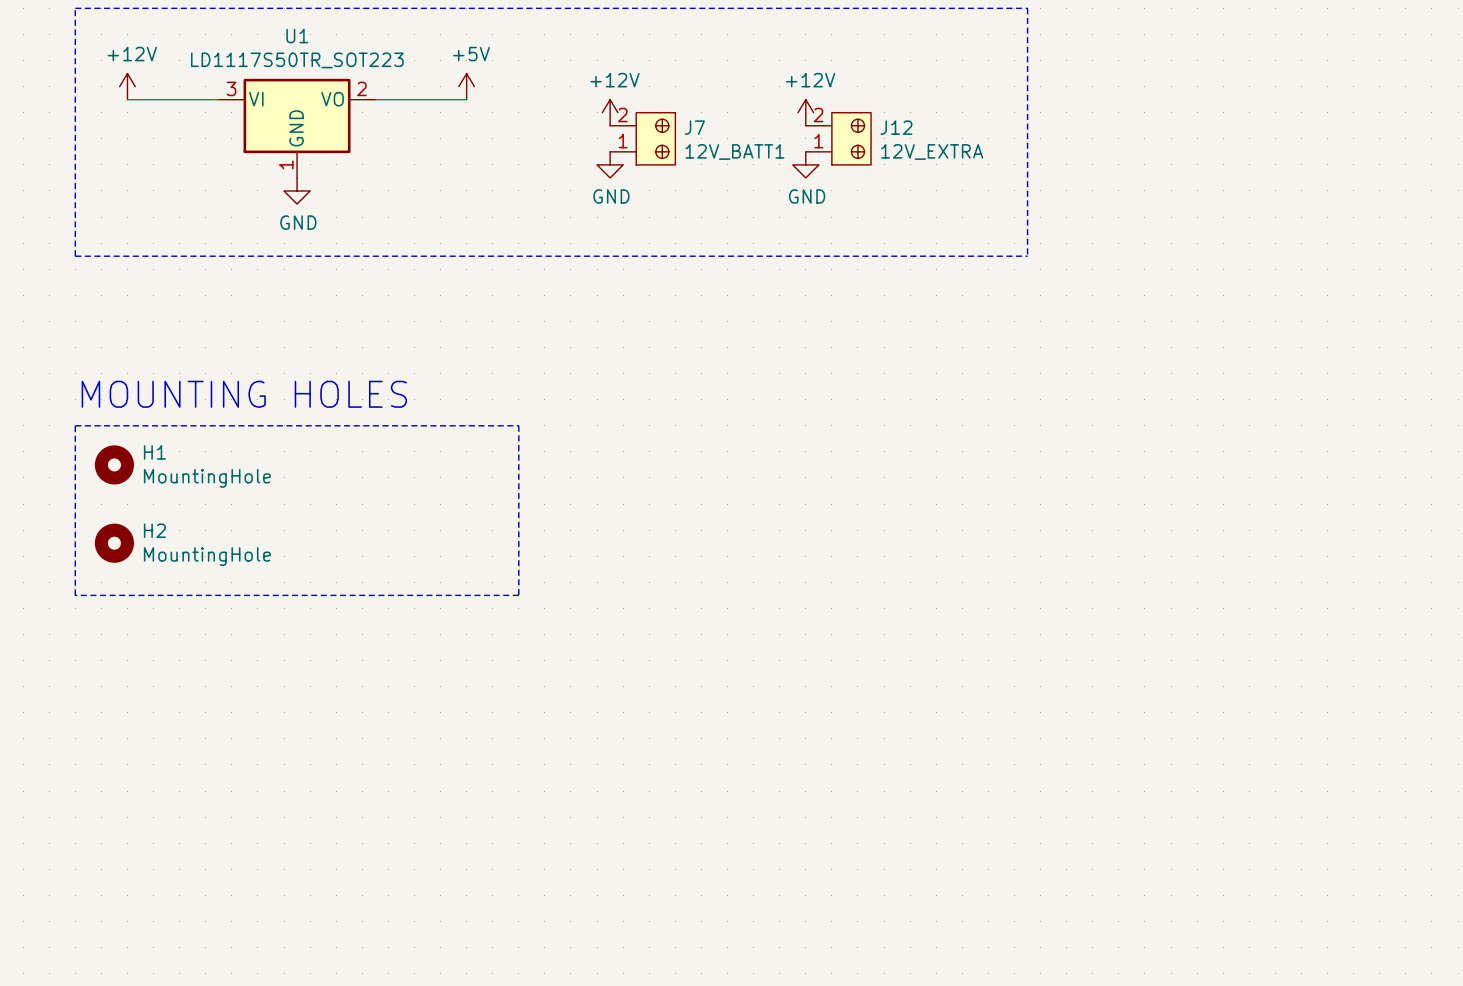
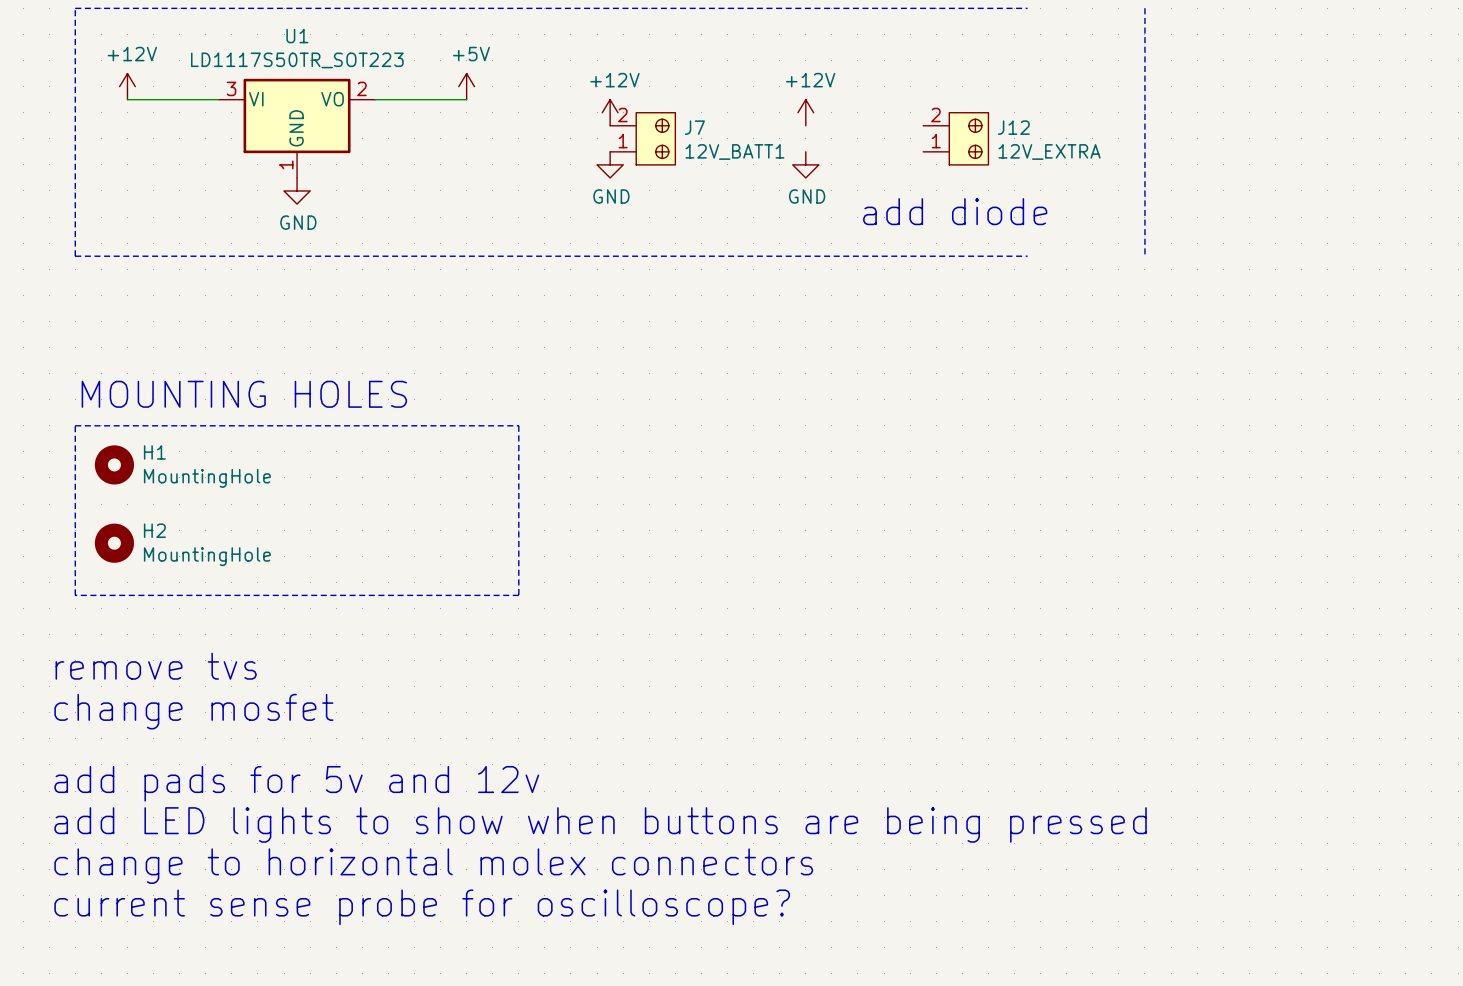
line: (1027, 8) (1027, 256) -> (1144, 8) (1144, 256)
J12 position: (838, 138) -> (955, 138)
text: none -> add diode (955, 211)
text: none -> remove tvs (156, 666)
text: none -> change mosfet (193, 711)
text: none -> add pads for 5v and 12v (296, 783)
text: none -> add LED lights to show when buttons are being pressed (600, 824)
text: none -> change to horizontal molex connectors (433, 866)
text: none -> current sense probe for oscilloscope? (422, 907)

